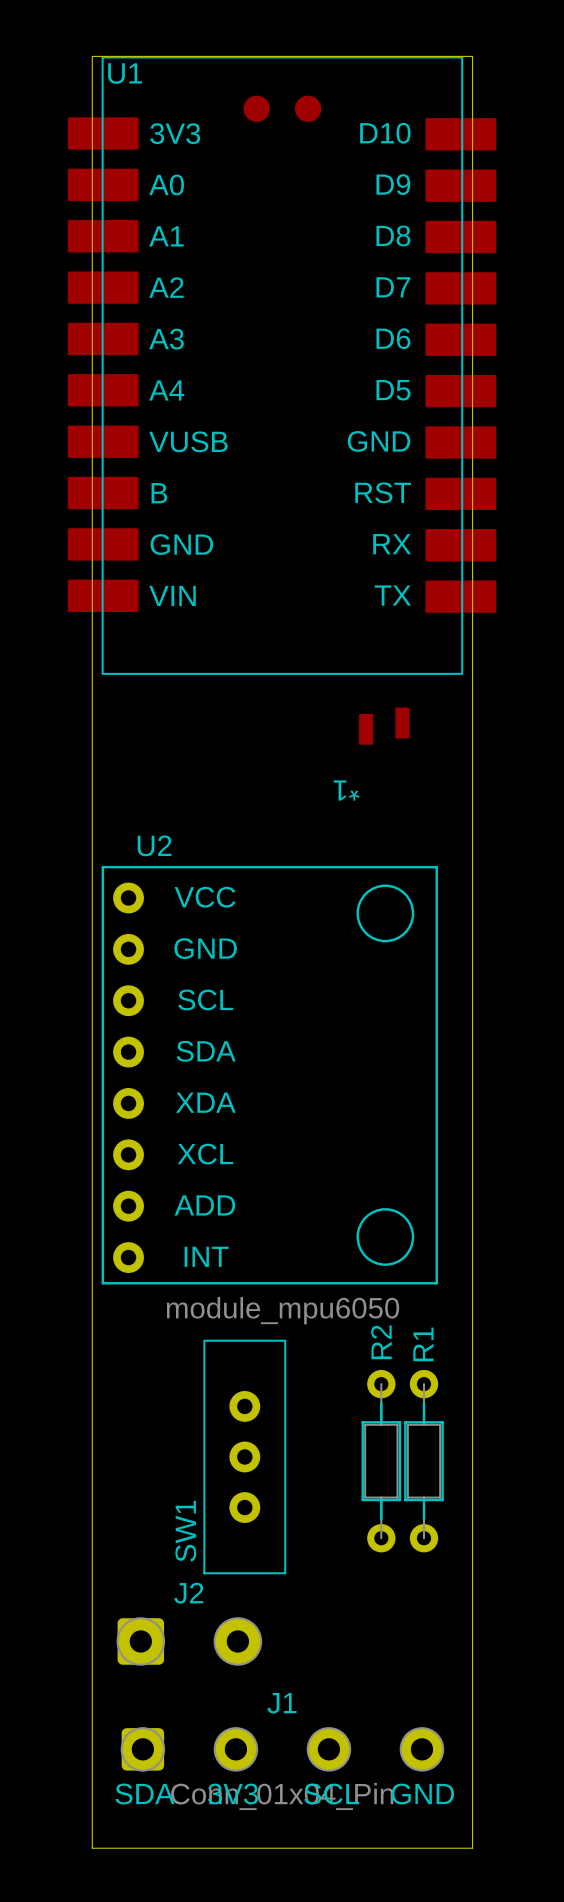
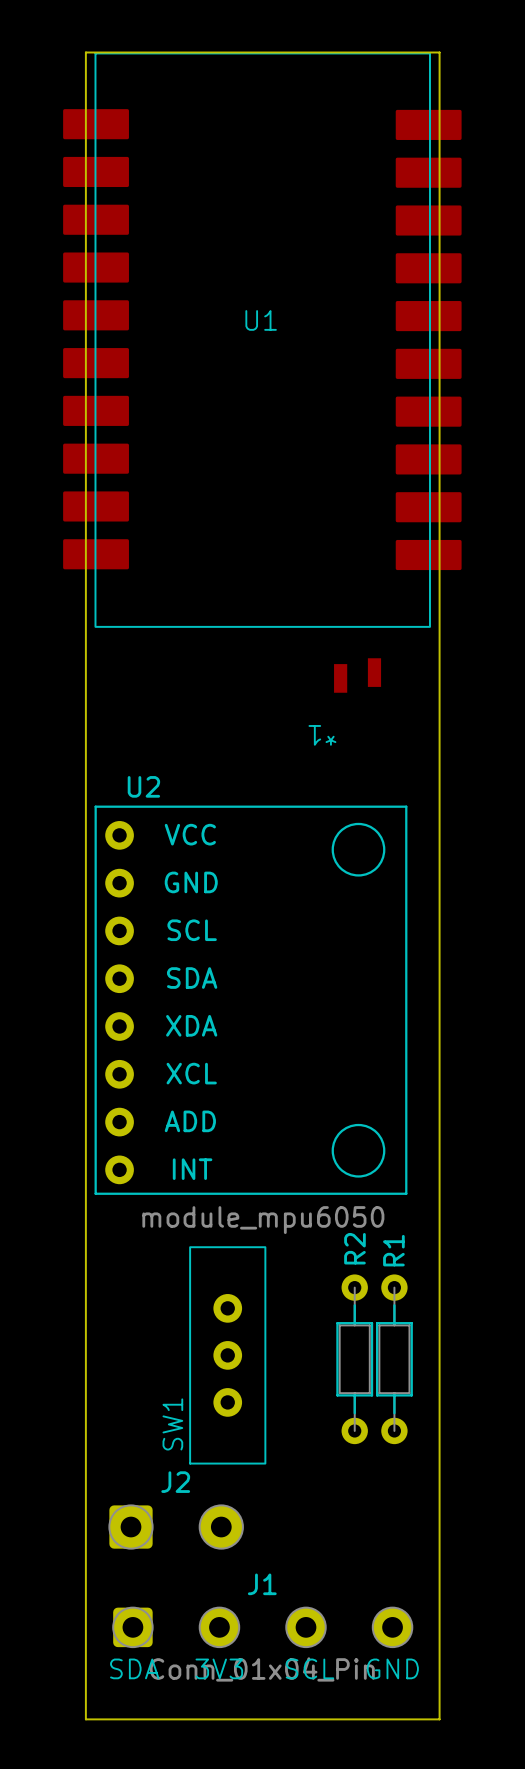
U1 footprint: [67, 56, 497, 675] -> [63, 52, 462, 628]
U1 name position: U1 (125, 73) -> U1 (261, 320)

